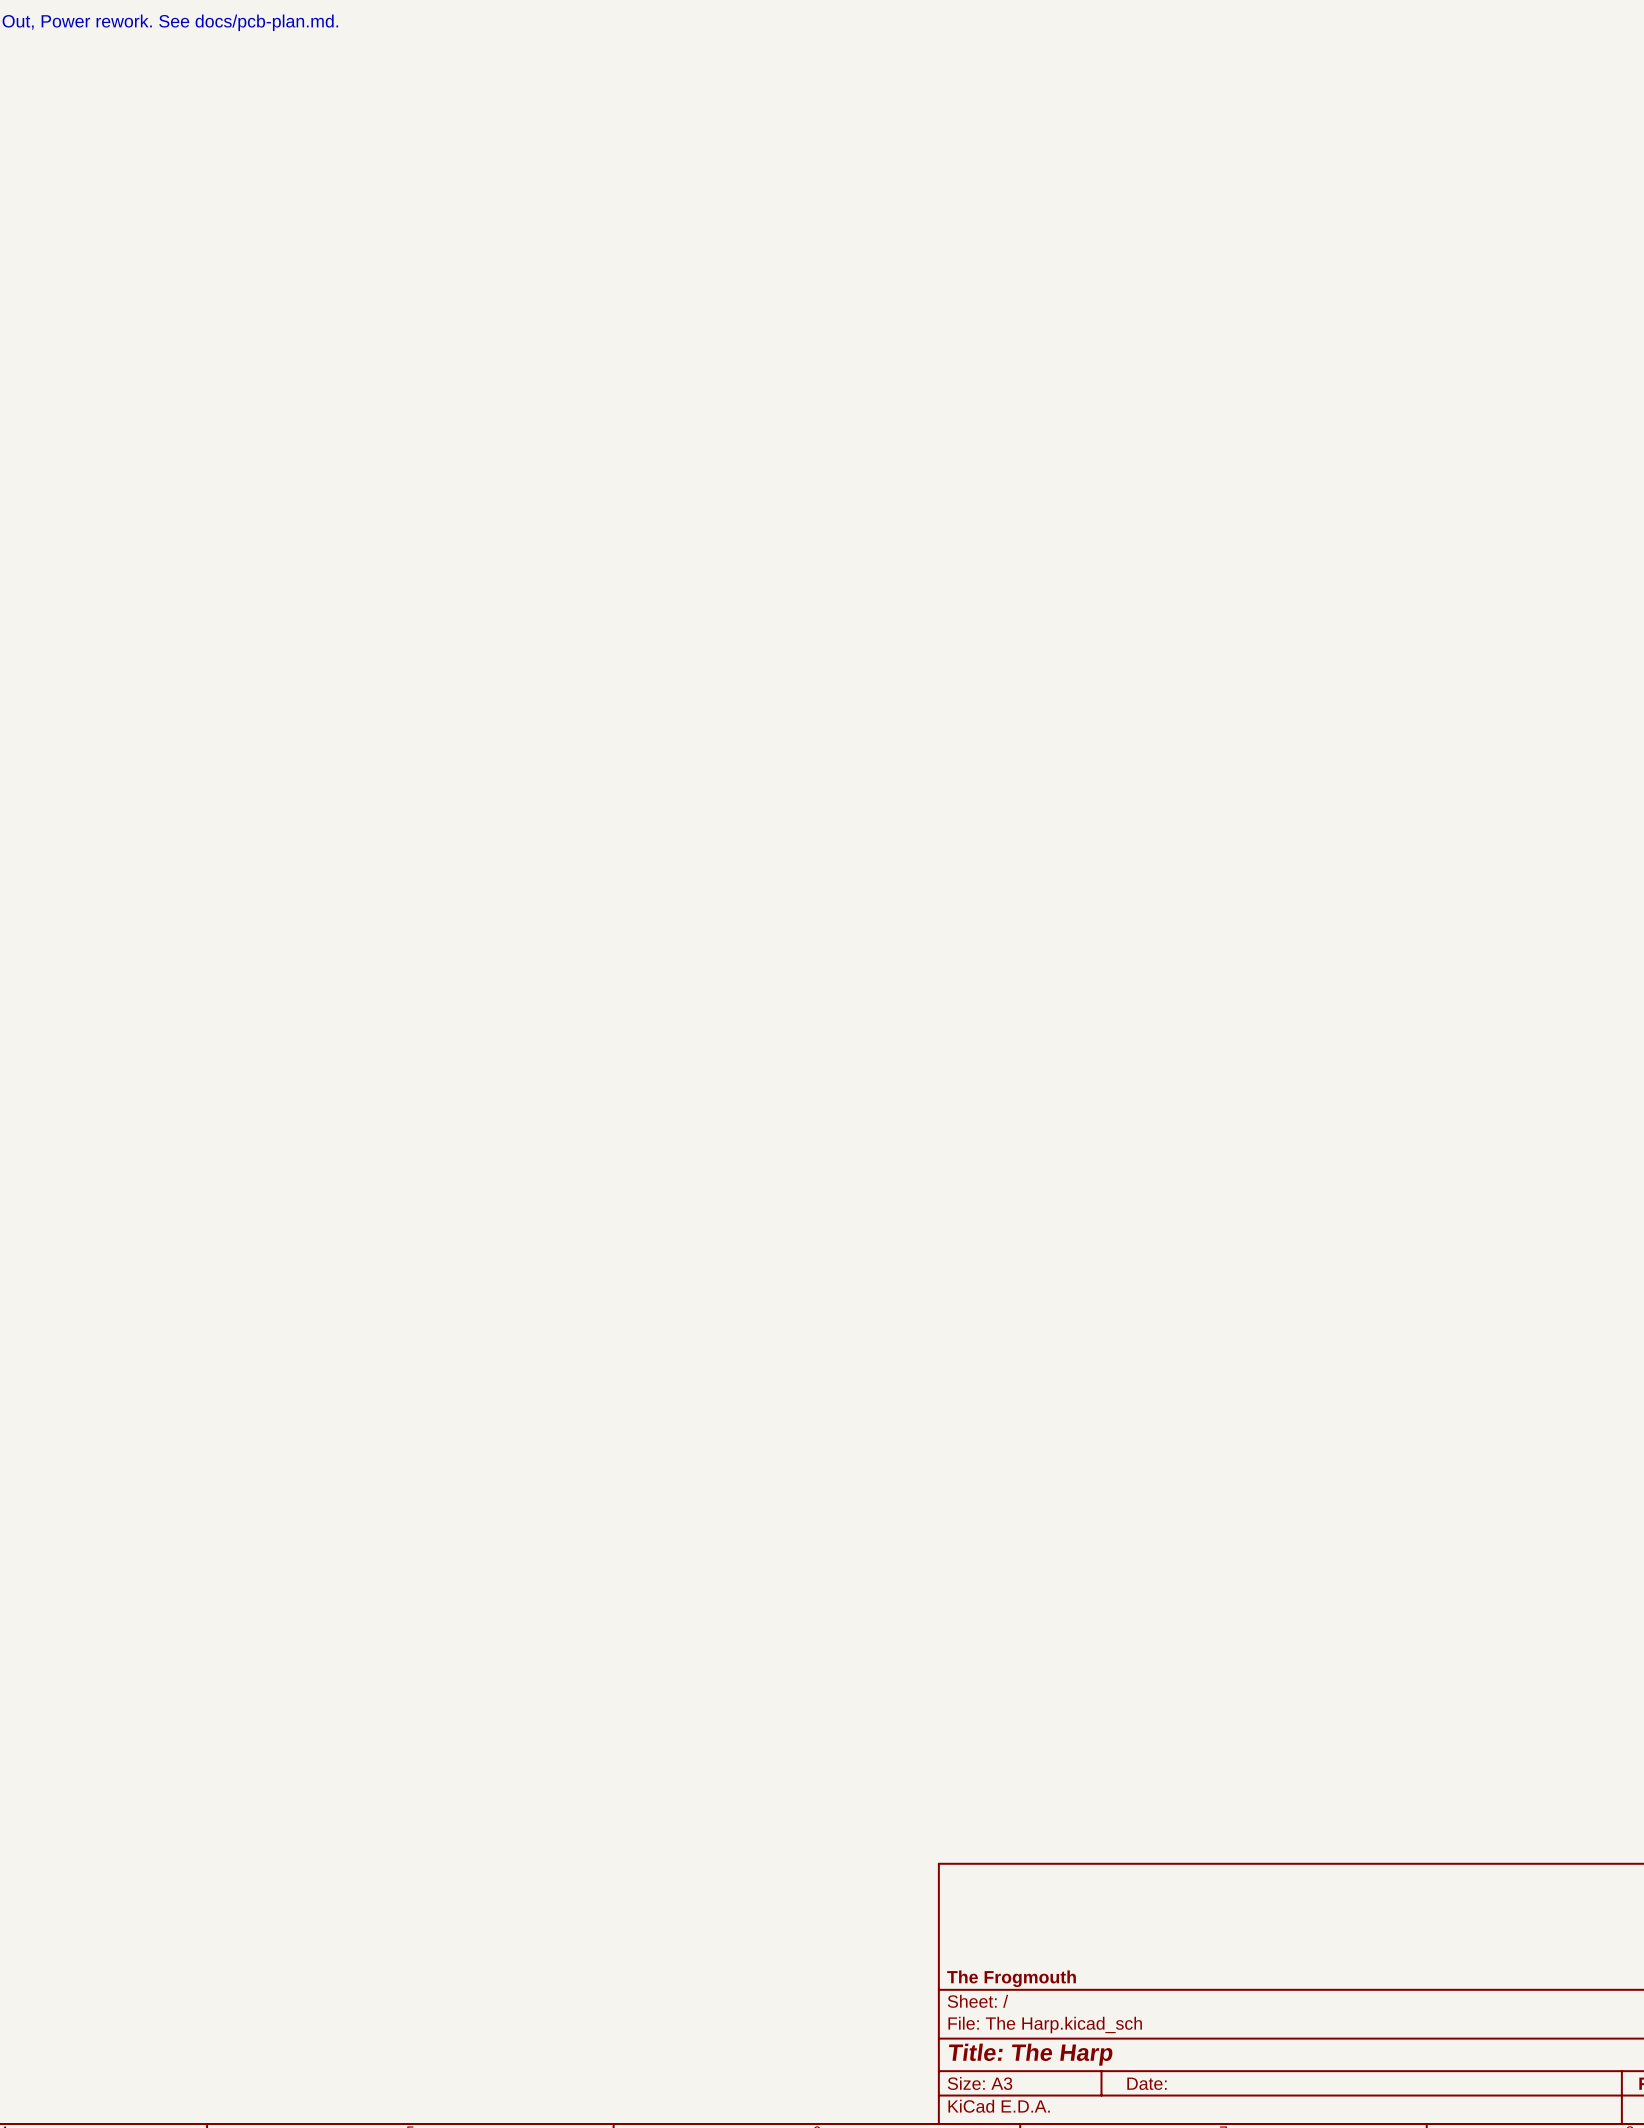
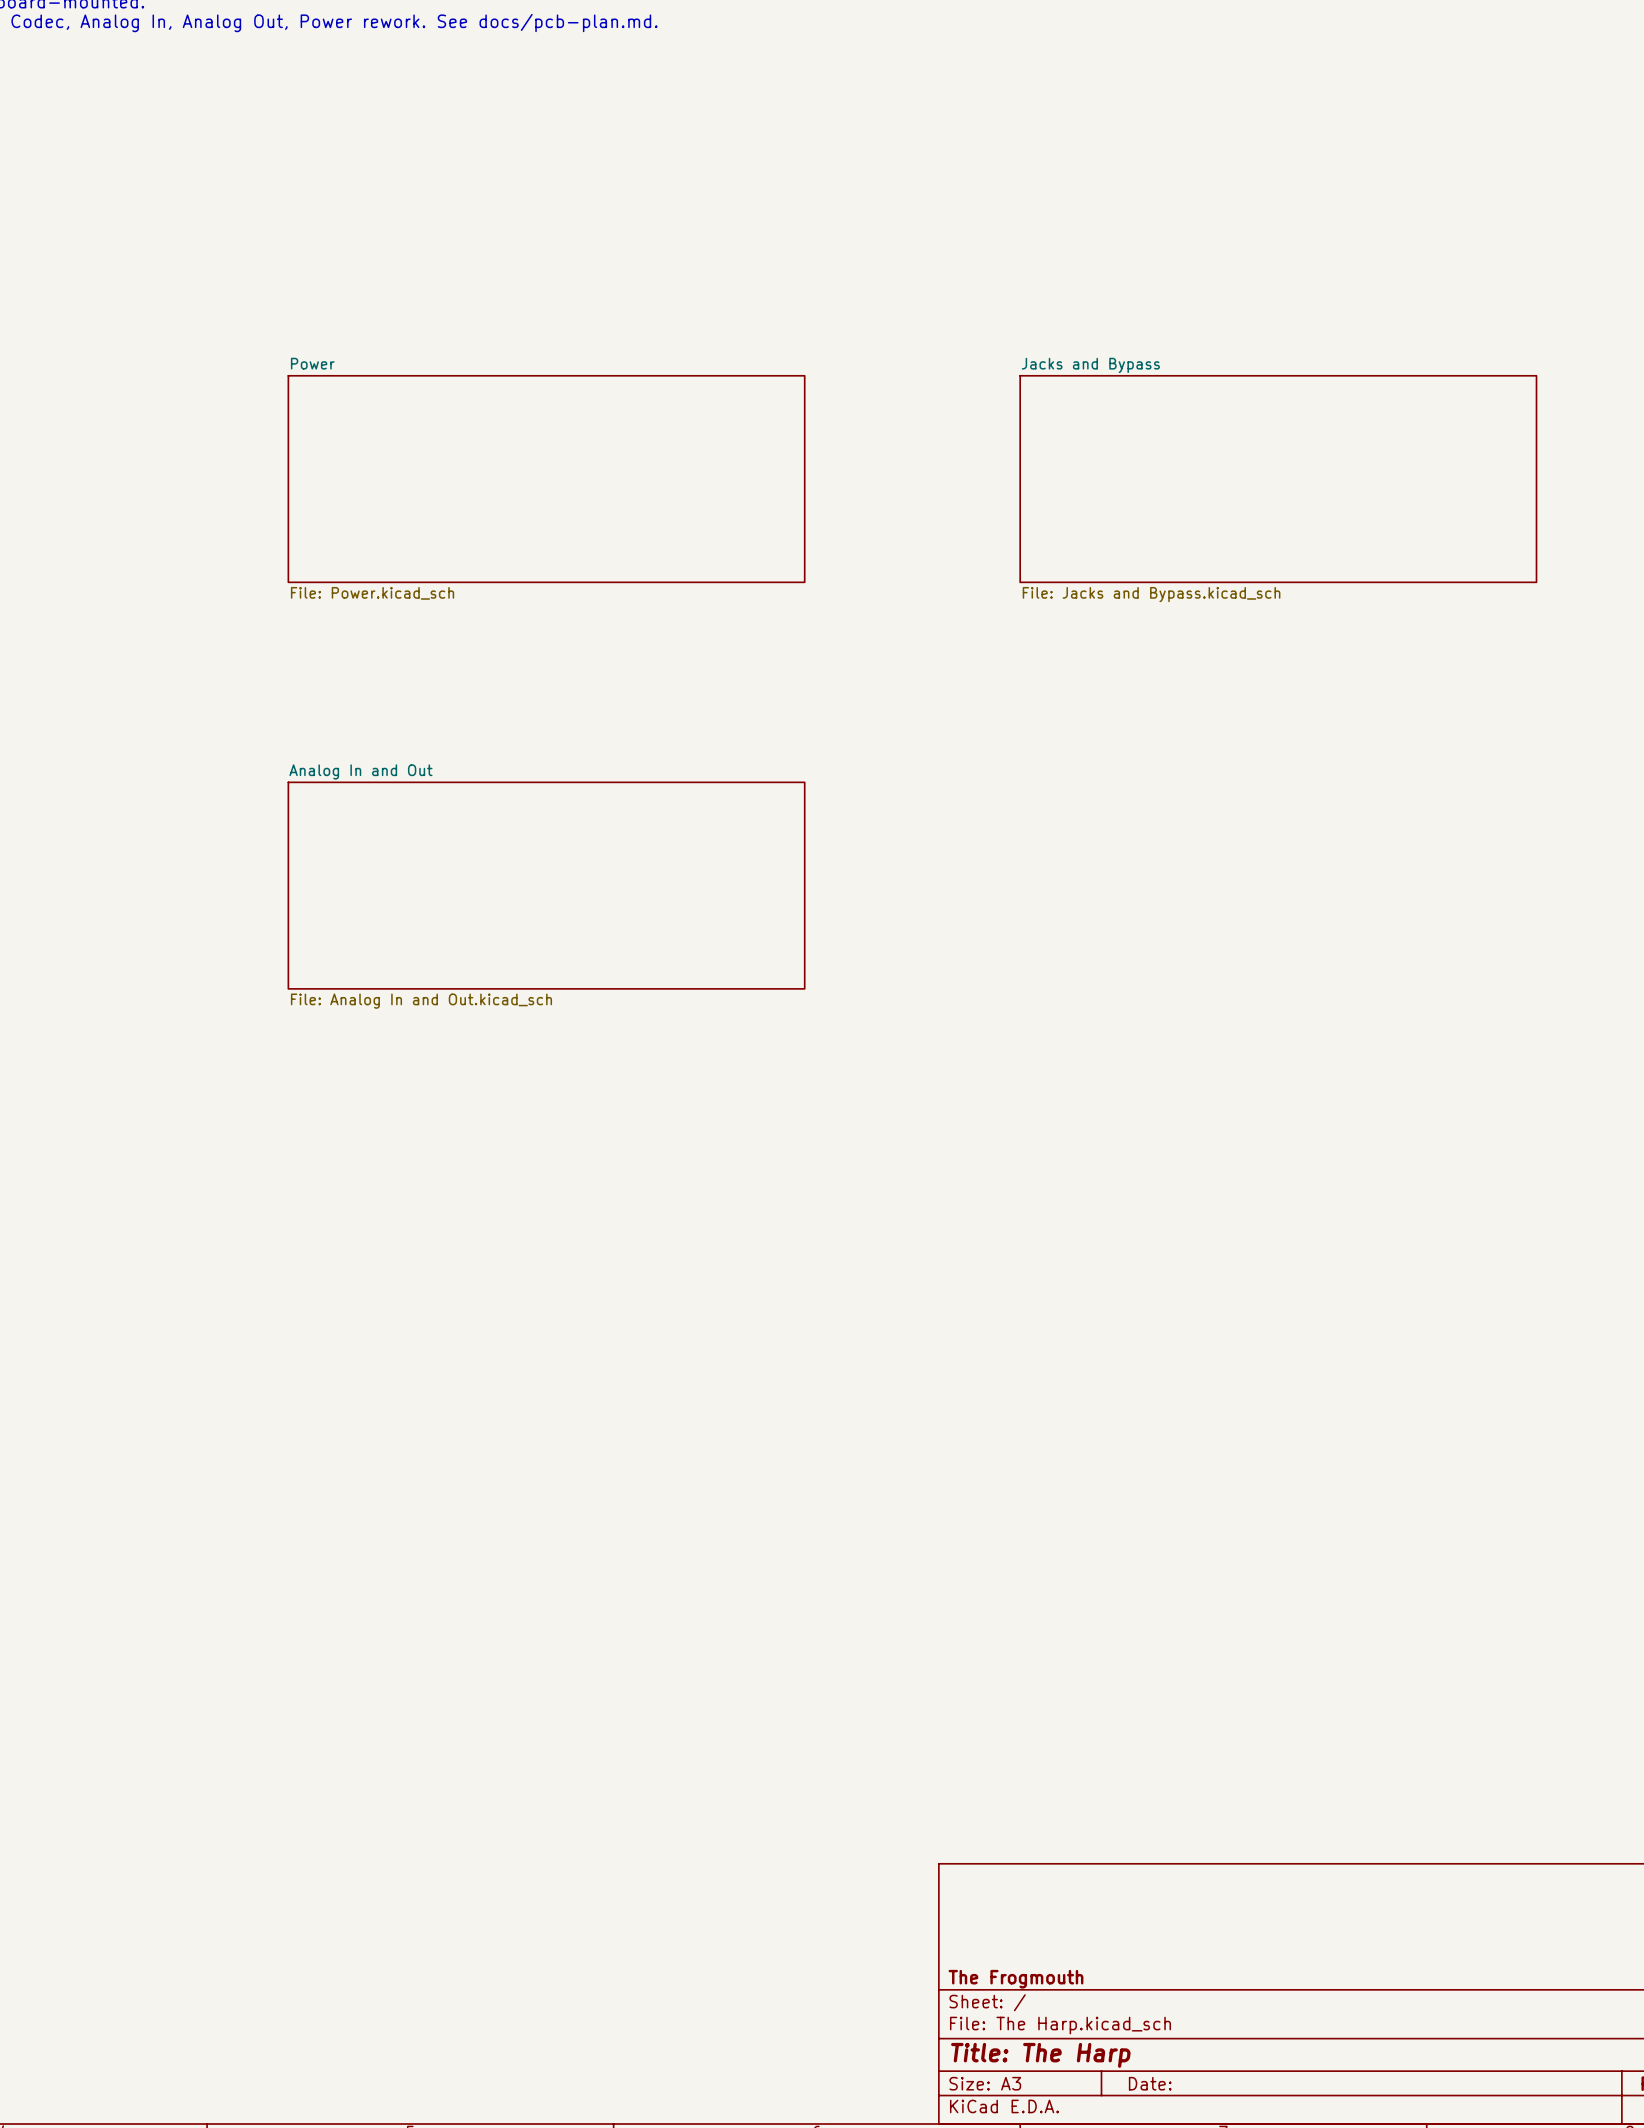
sheet Power: none -> File: Power.kicad_sch (546, 479)
sheet Jacks and Bypass: none -> File: Jacks and Bypass.kicad_sch (1278, 479)
sheet Analog In and Out: none -> File: Analog In and Out.kicad_sch (546, 885)

